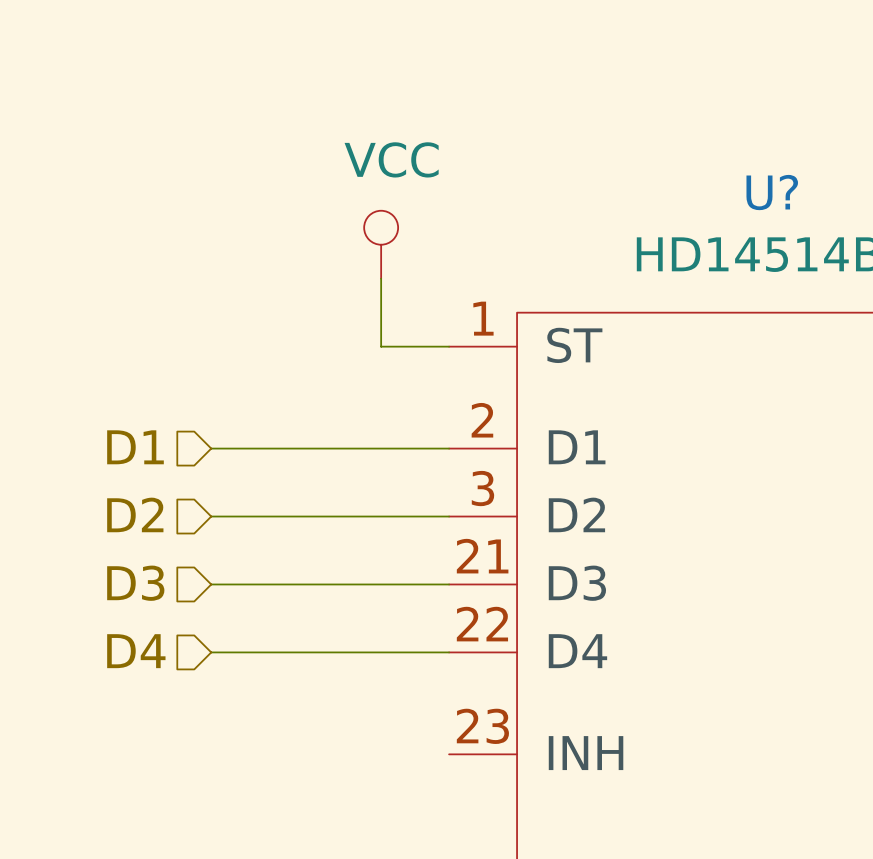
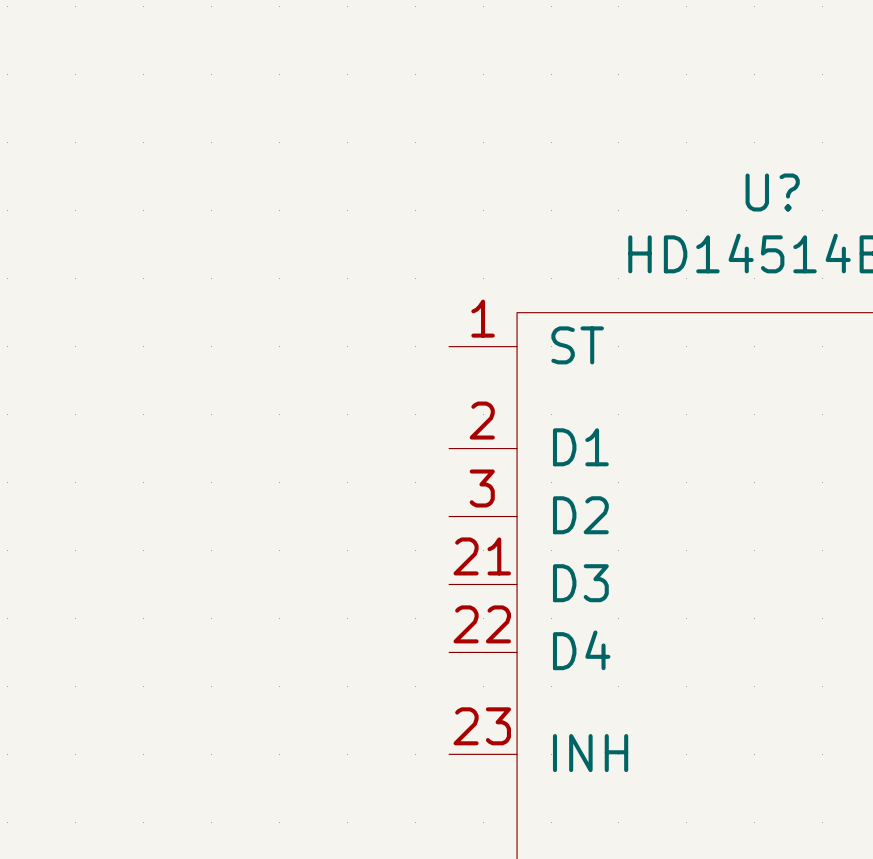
power symbol: VCC (381, 244) -> none
wire: (381, 278) (381, 346) (449, 346) -> none
hierarchical label: D1 (135, 447) -> none
wire: (211, 448) (449, 448) -> none
hierarchical label: D2 (135, 514) -> none
wire: (211, 516) (449, 516) -> none
hierarchical label: D3 (135, 583) -> none
wire: (211, 584) (449, 584) -> none
hierarchical label: D4 (136, 651) -> none
wire: (211, 652) (449, 652) -> none

